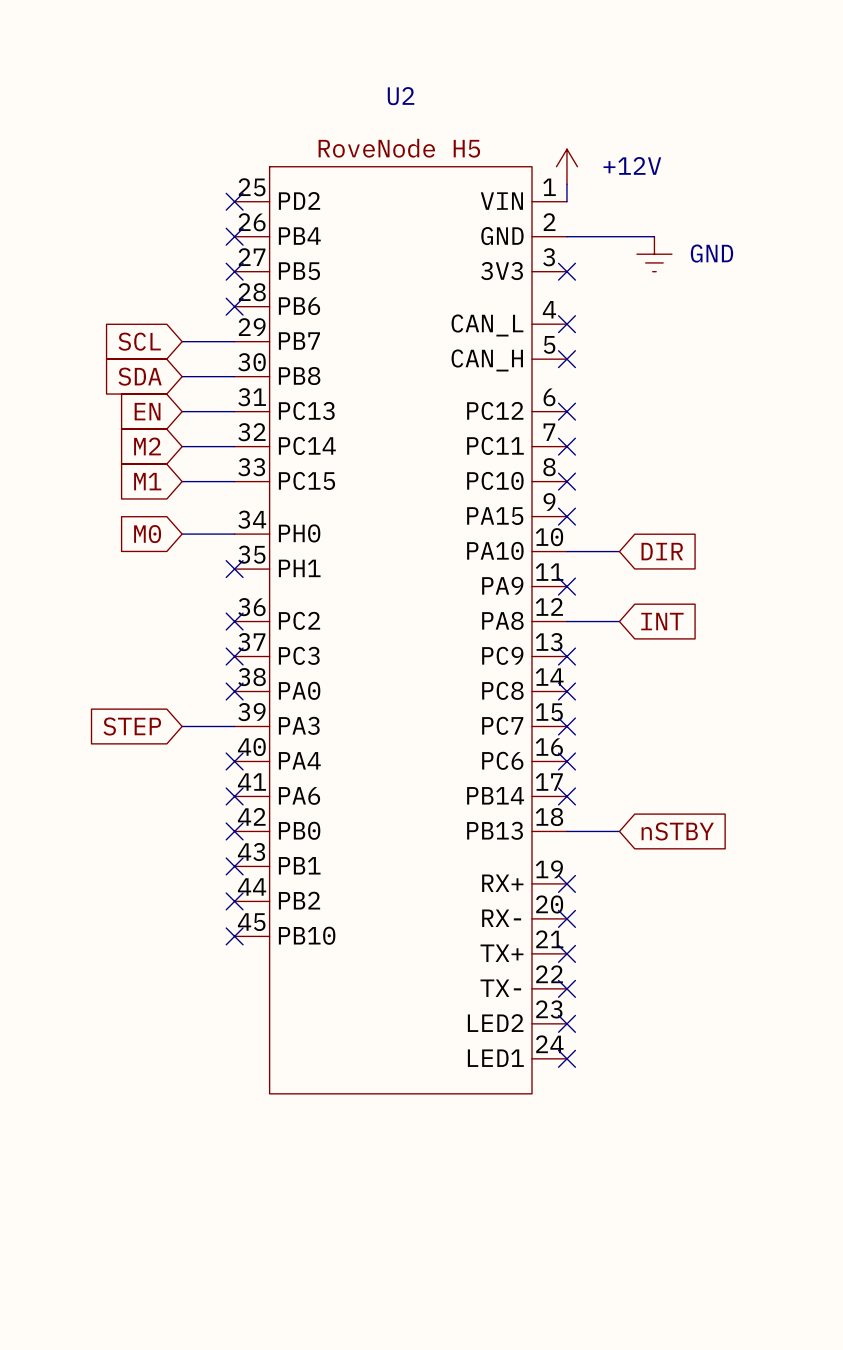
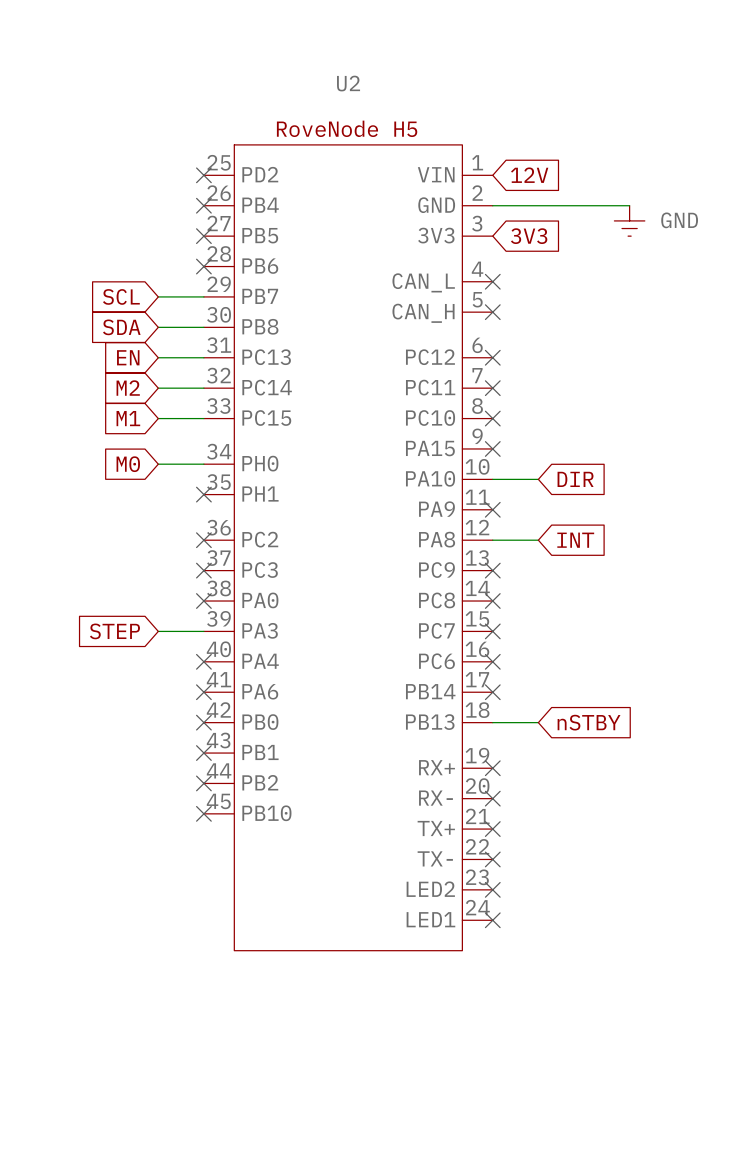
power symbol: +12V (566, 166) -> none
wire: (566, 184) (566, 201) -> none
global label: none -> 12V (529, 175)
wire: none -> (568, 205) (629, 205)
power symbol position: GND (654, 254) -> GND (629, 220)
no-connect mark: (566, 271) -> none
global label: none -> 3V3 (529, 236)

